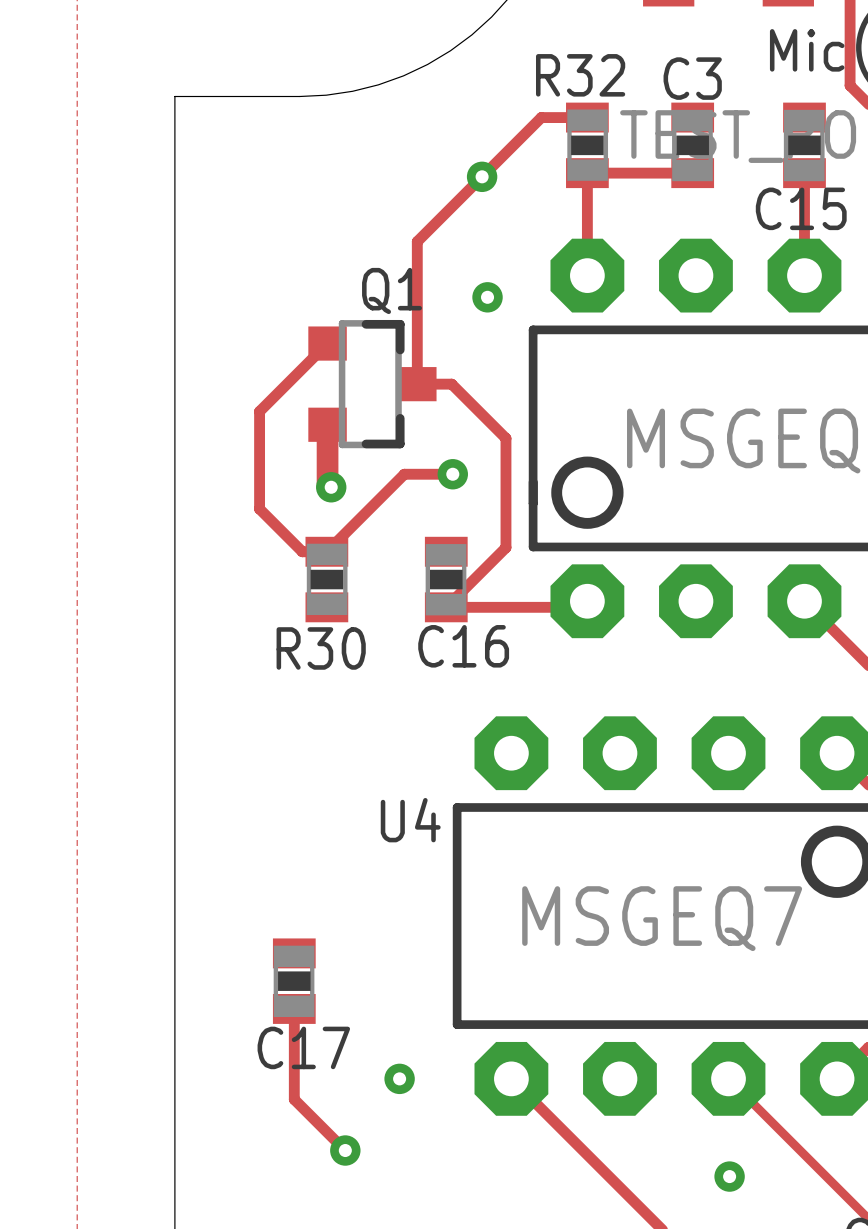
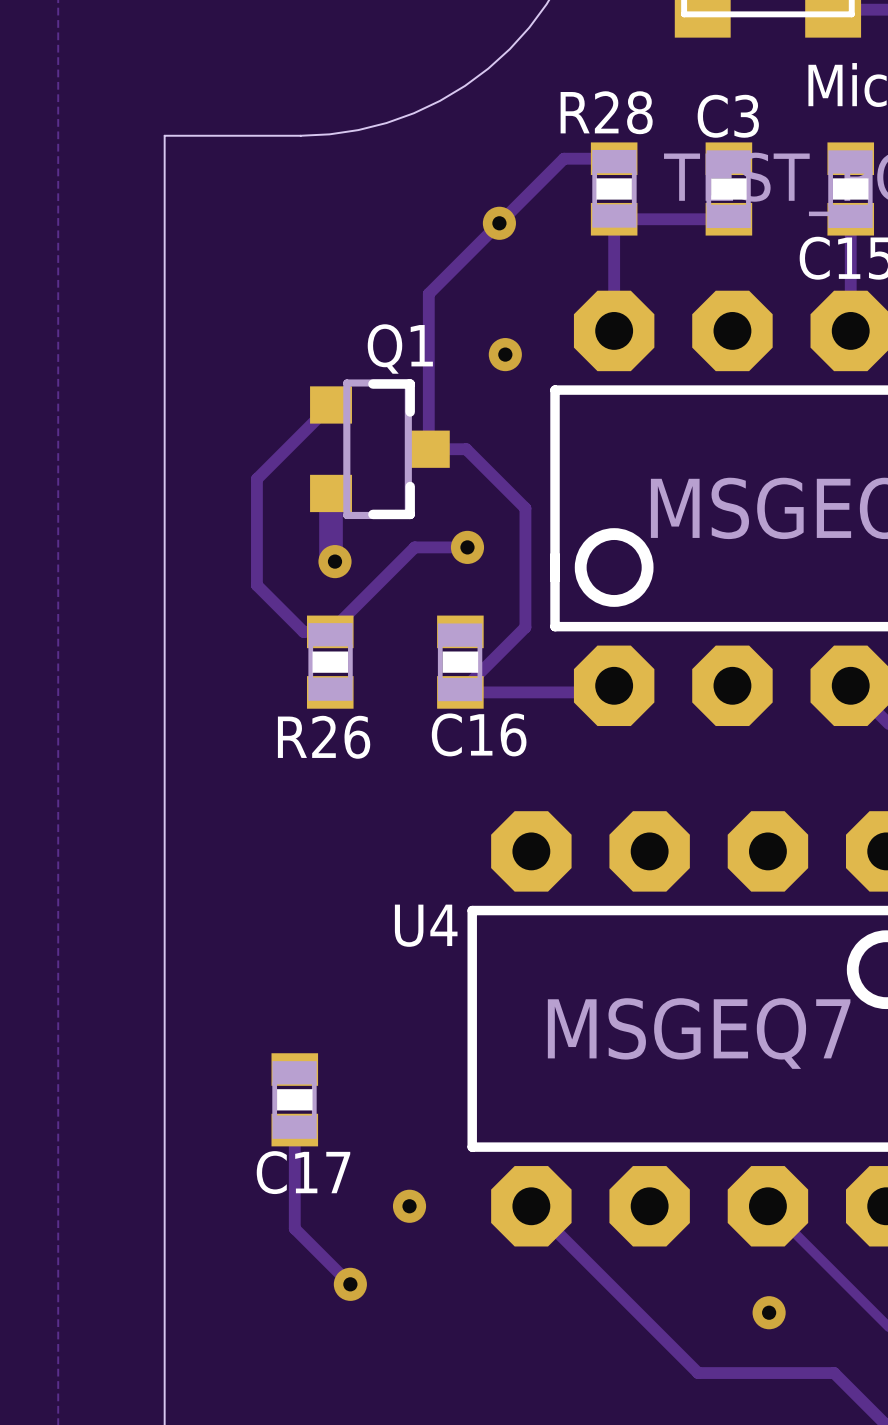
R32 name: R32 (580, 75) -> R28 (606, 112)
R30 name: R30 (321, 648) -> R26 (324, 737)

